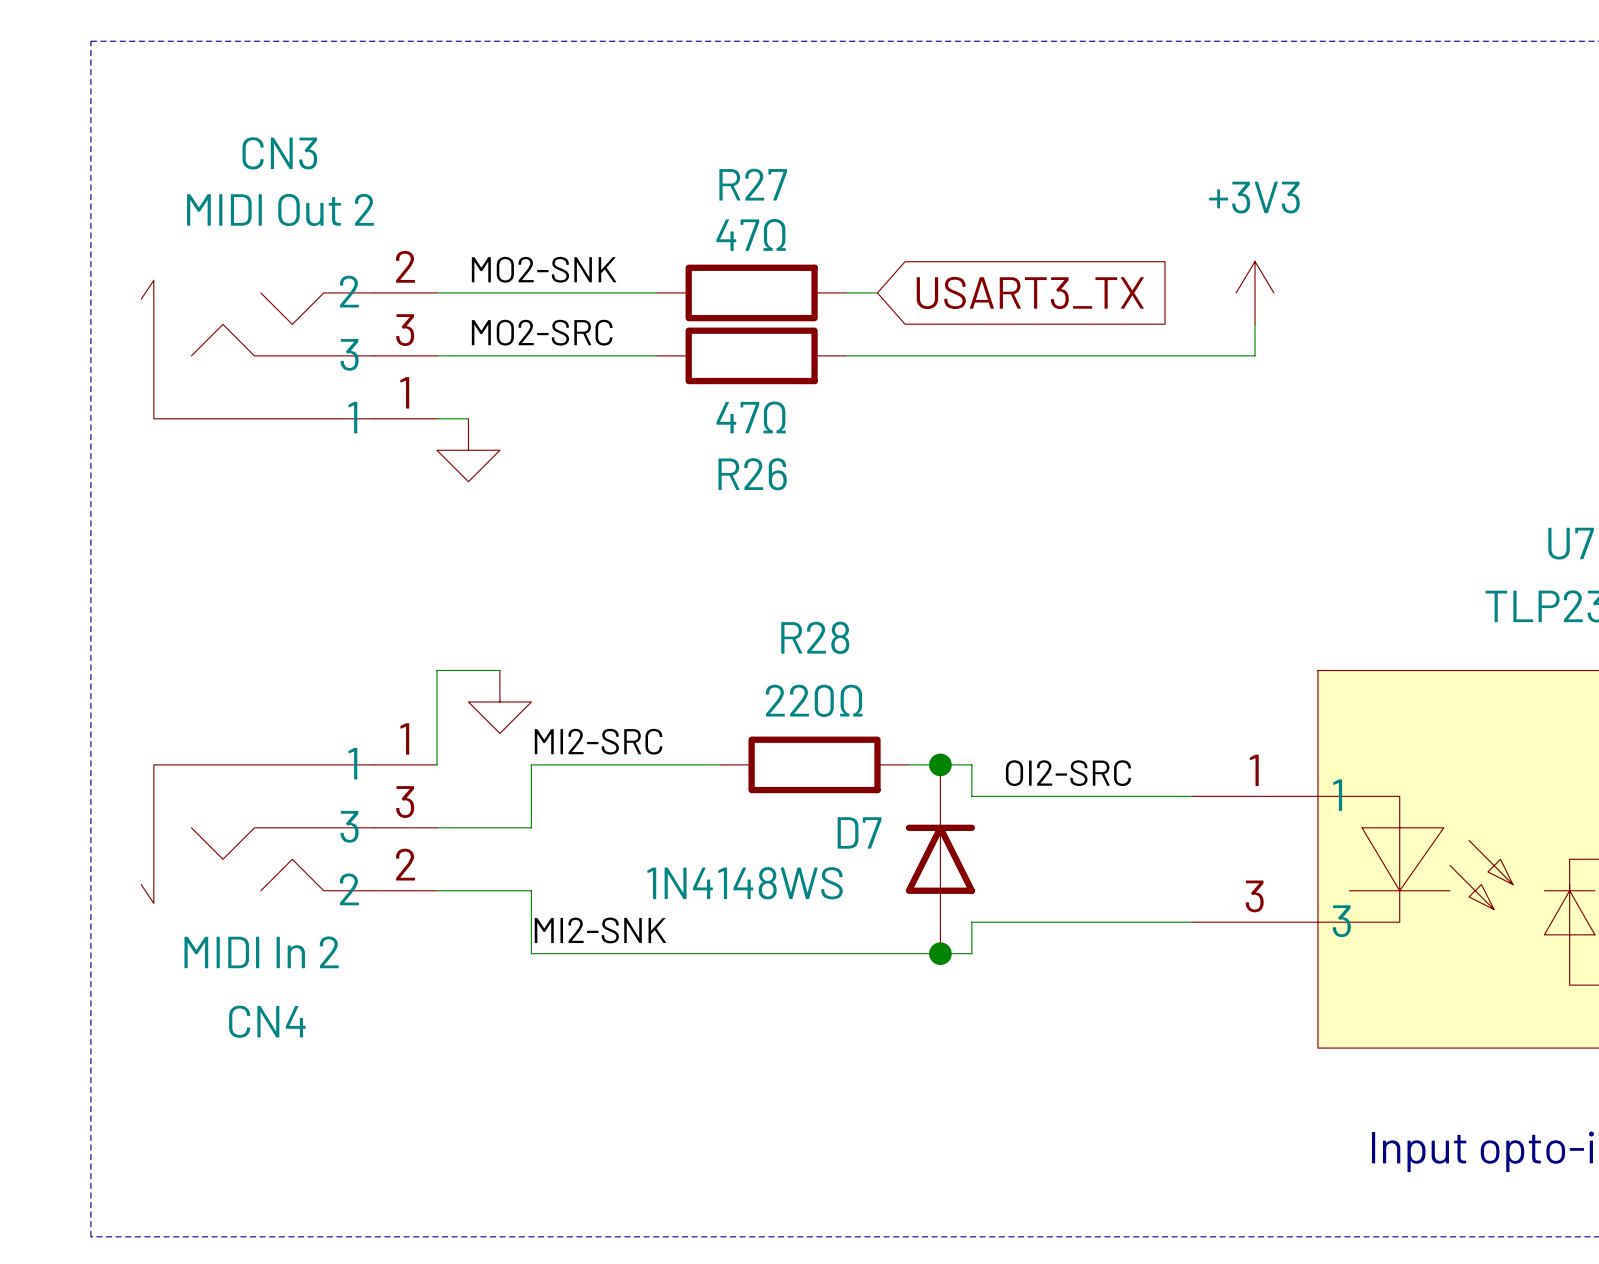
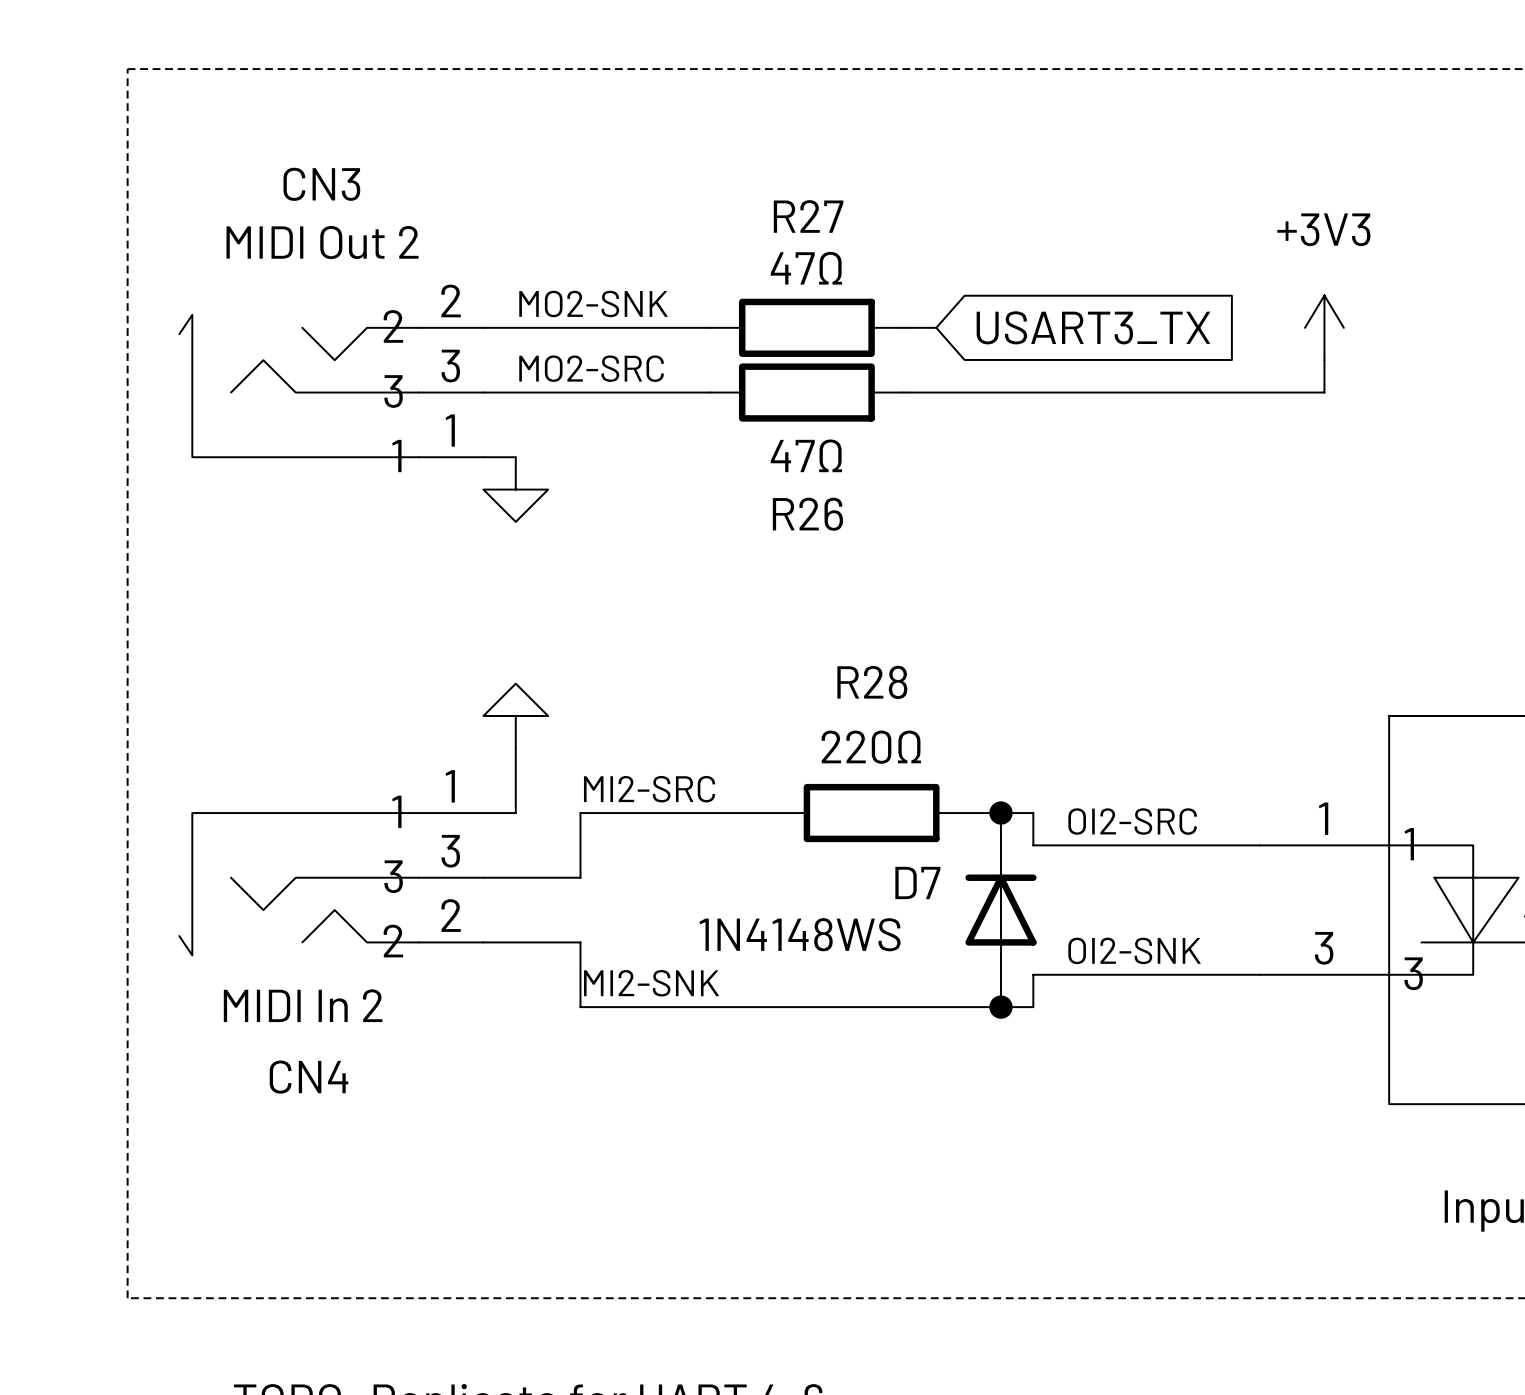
wire: (499, 670) (437, 670) (437, 764) -> (515, 748) (515, 813) (483, 813)
power symbol rotation: 0° (499, 701) -> 180° (515, 716)
power symbol position: (499, 701) -> (515, 716)
label: none -> OI2-SNK (1134, 950)

